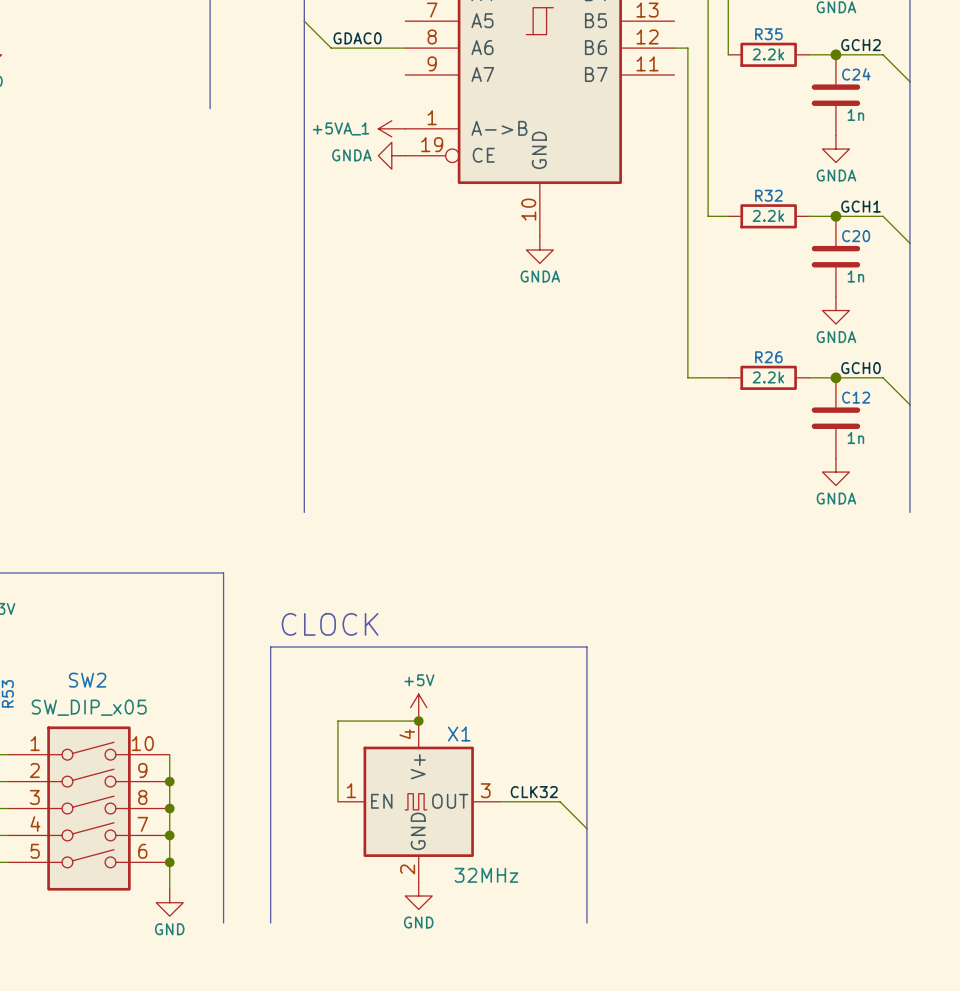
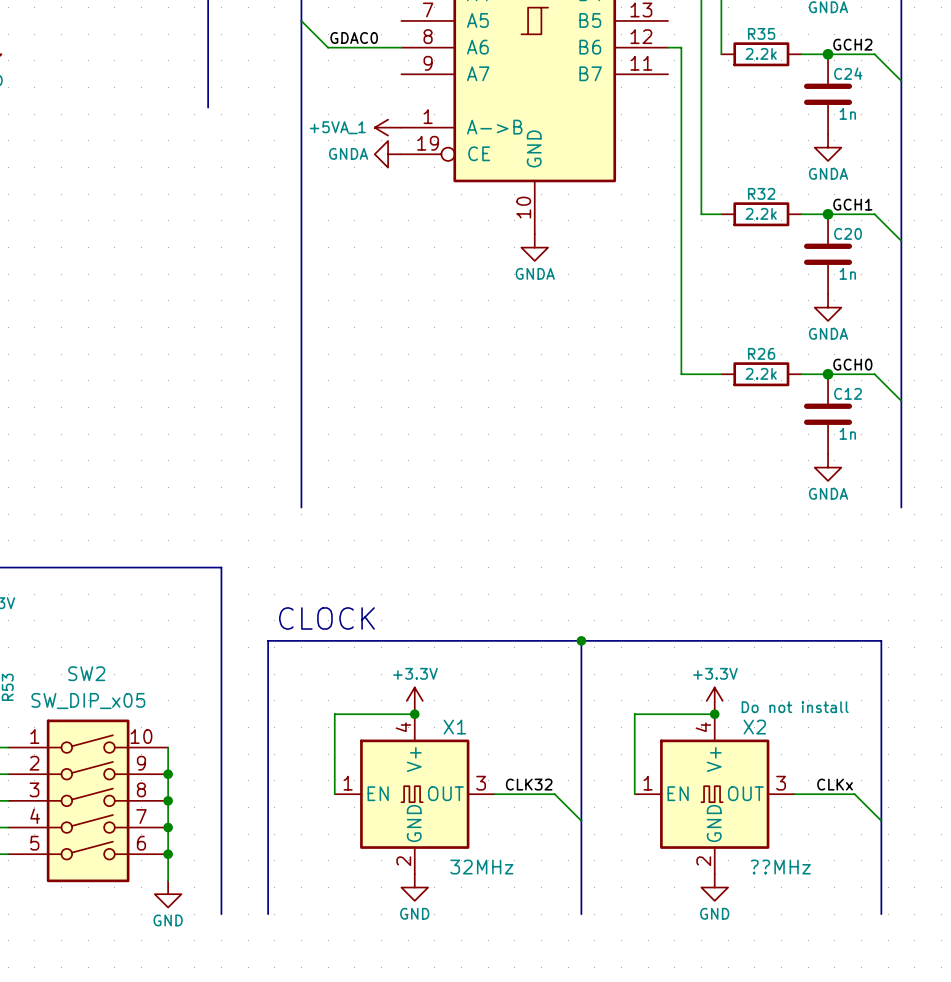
bus: none -> (581, 640) (881, 640) (881, 914)
junction: none -> (581, 640)
power symbol: +5V (418, 707) -> +3.3V (414, 700)
power symbol: none -> +3.3V (714, 700)
wire: none -> (714, 714) (634, 714) (634, 794)
junction: none -> (714, 714)
label: none -> CLKx (835, 784)
X2: none -> ??MHz (714, 794)
wire: none -> (794, 794) (854, 794) (881, 820)
power symbol: none -> GND (714, 887)

